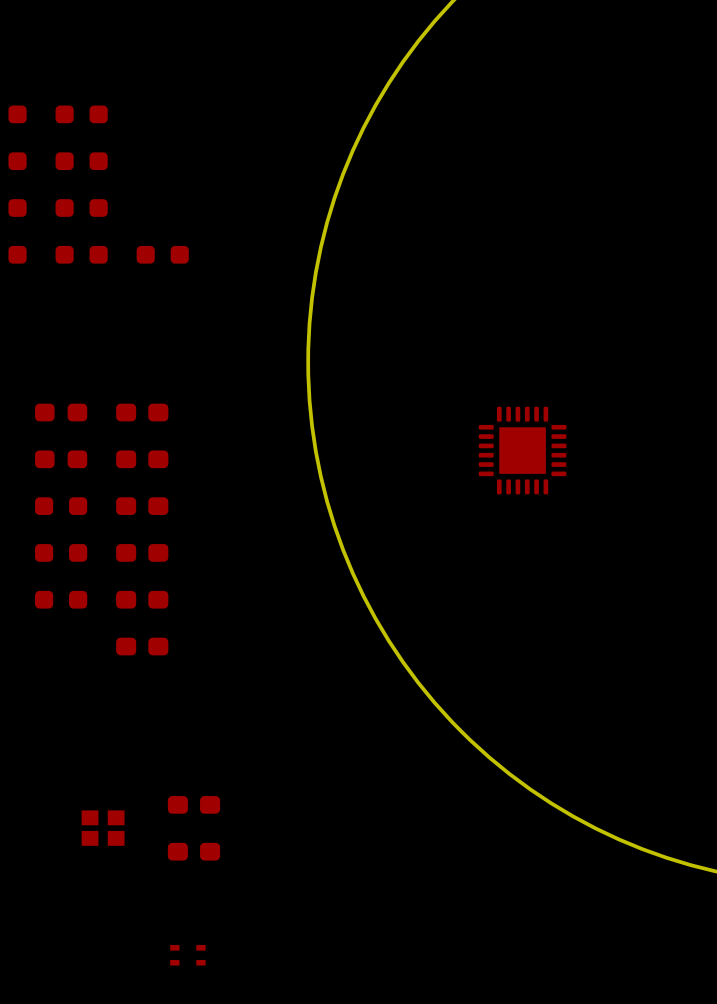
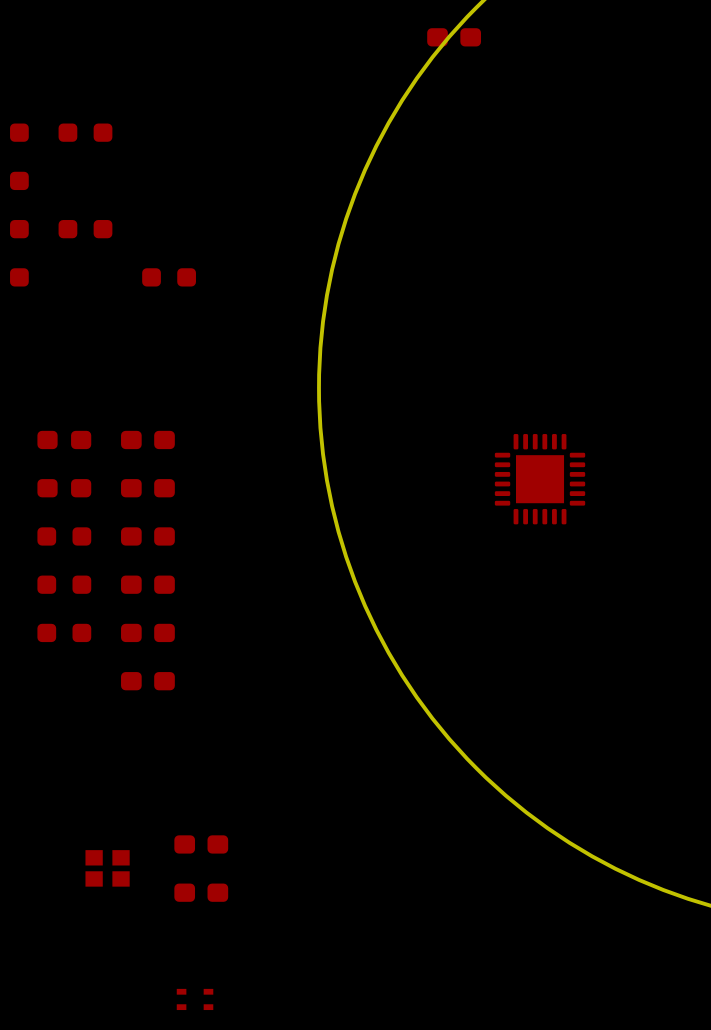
part: none -> (454, 37)
part: (81, 161) -> none
part: (81, 254) -> none

